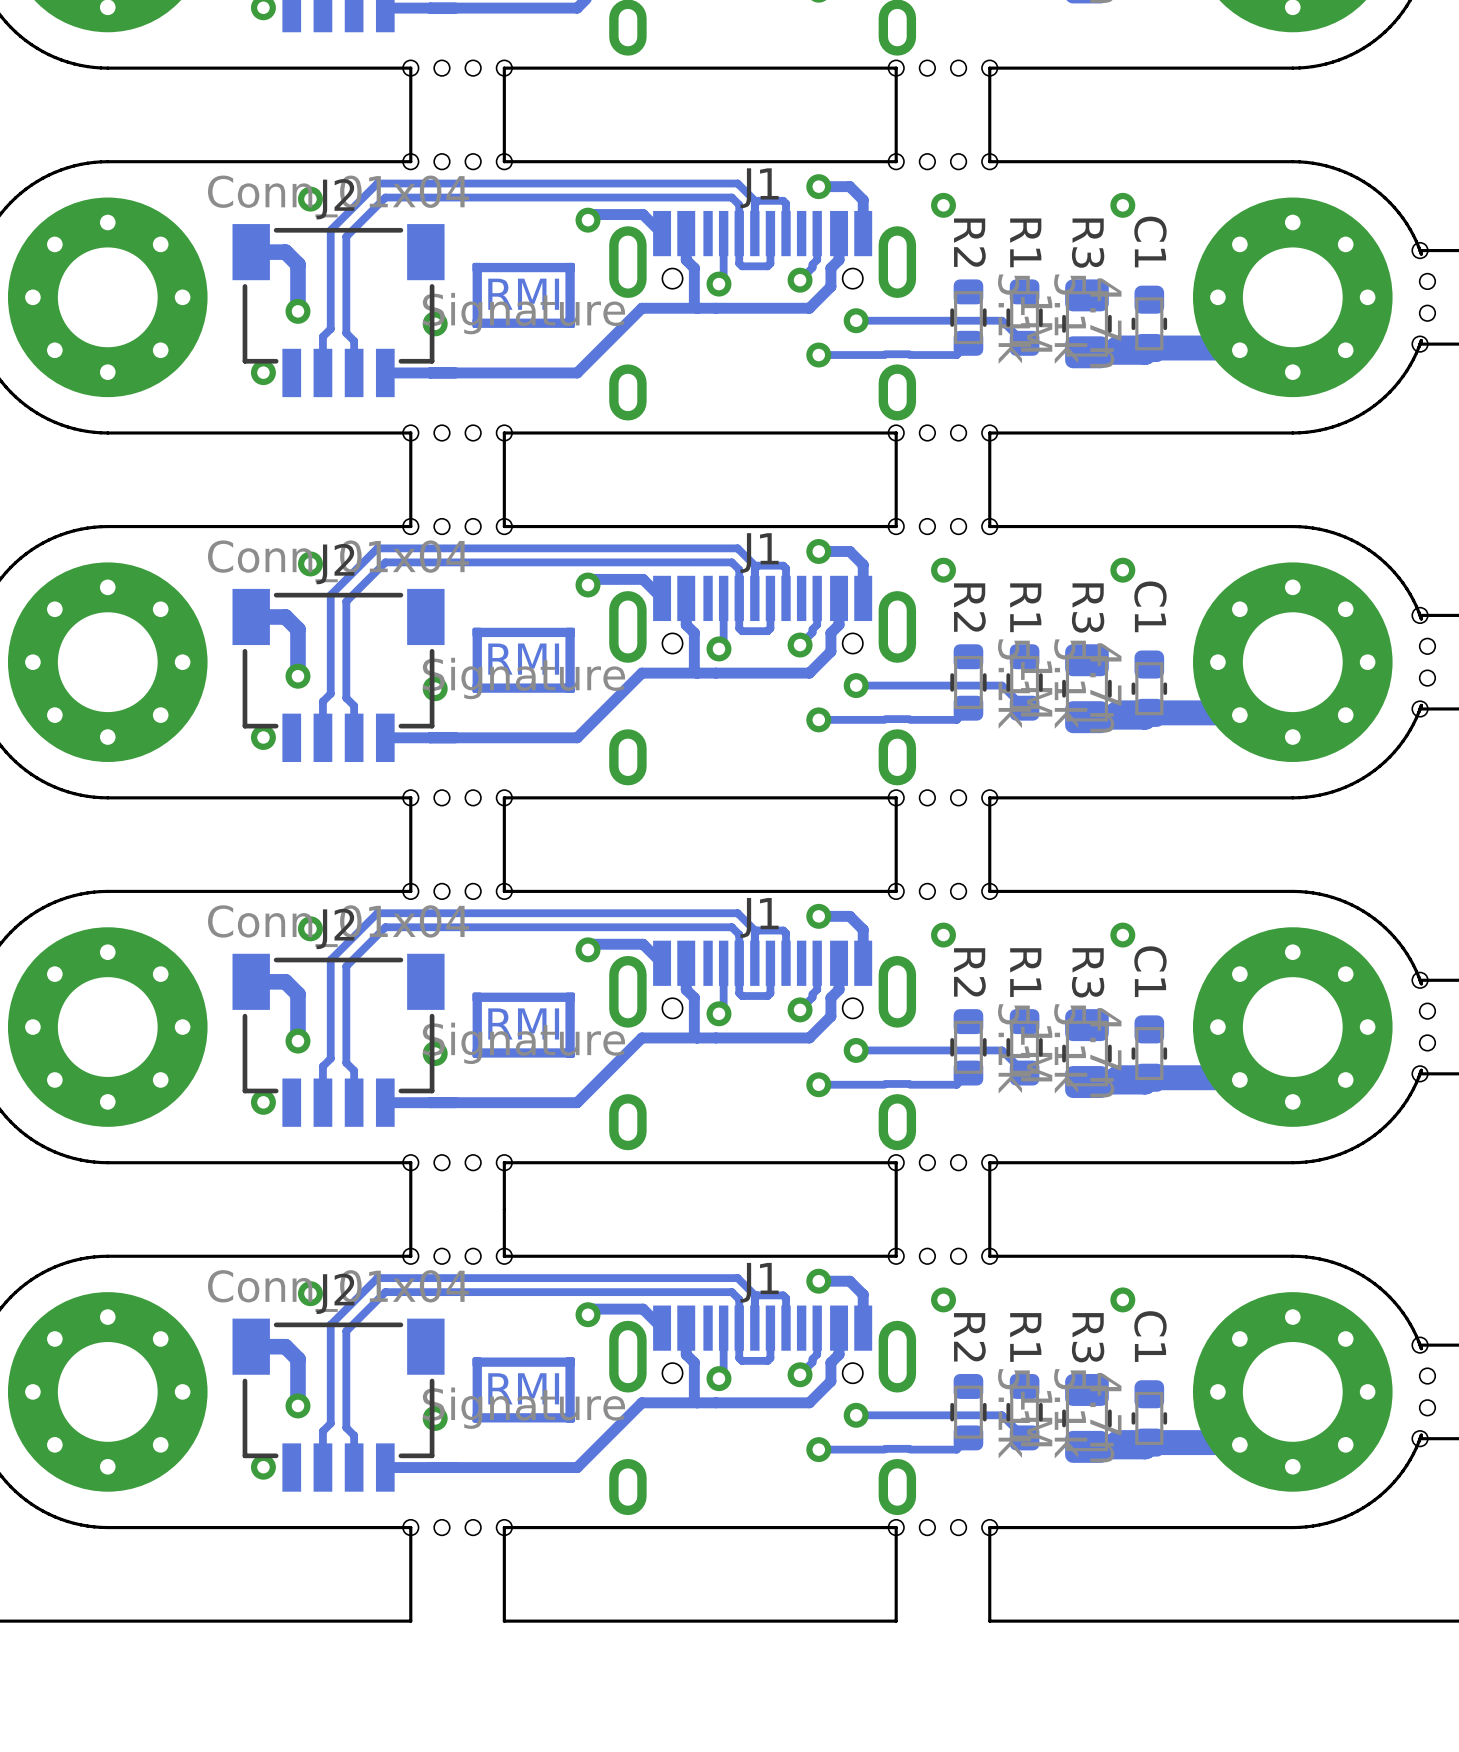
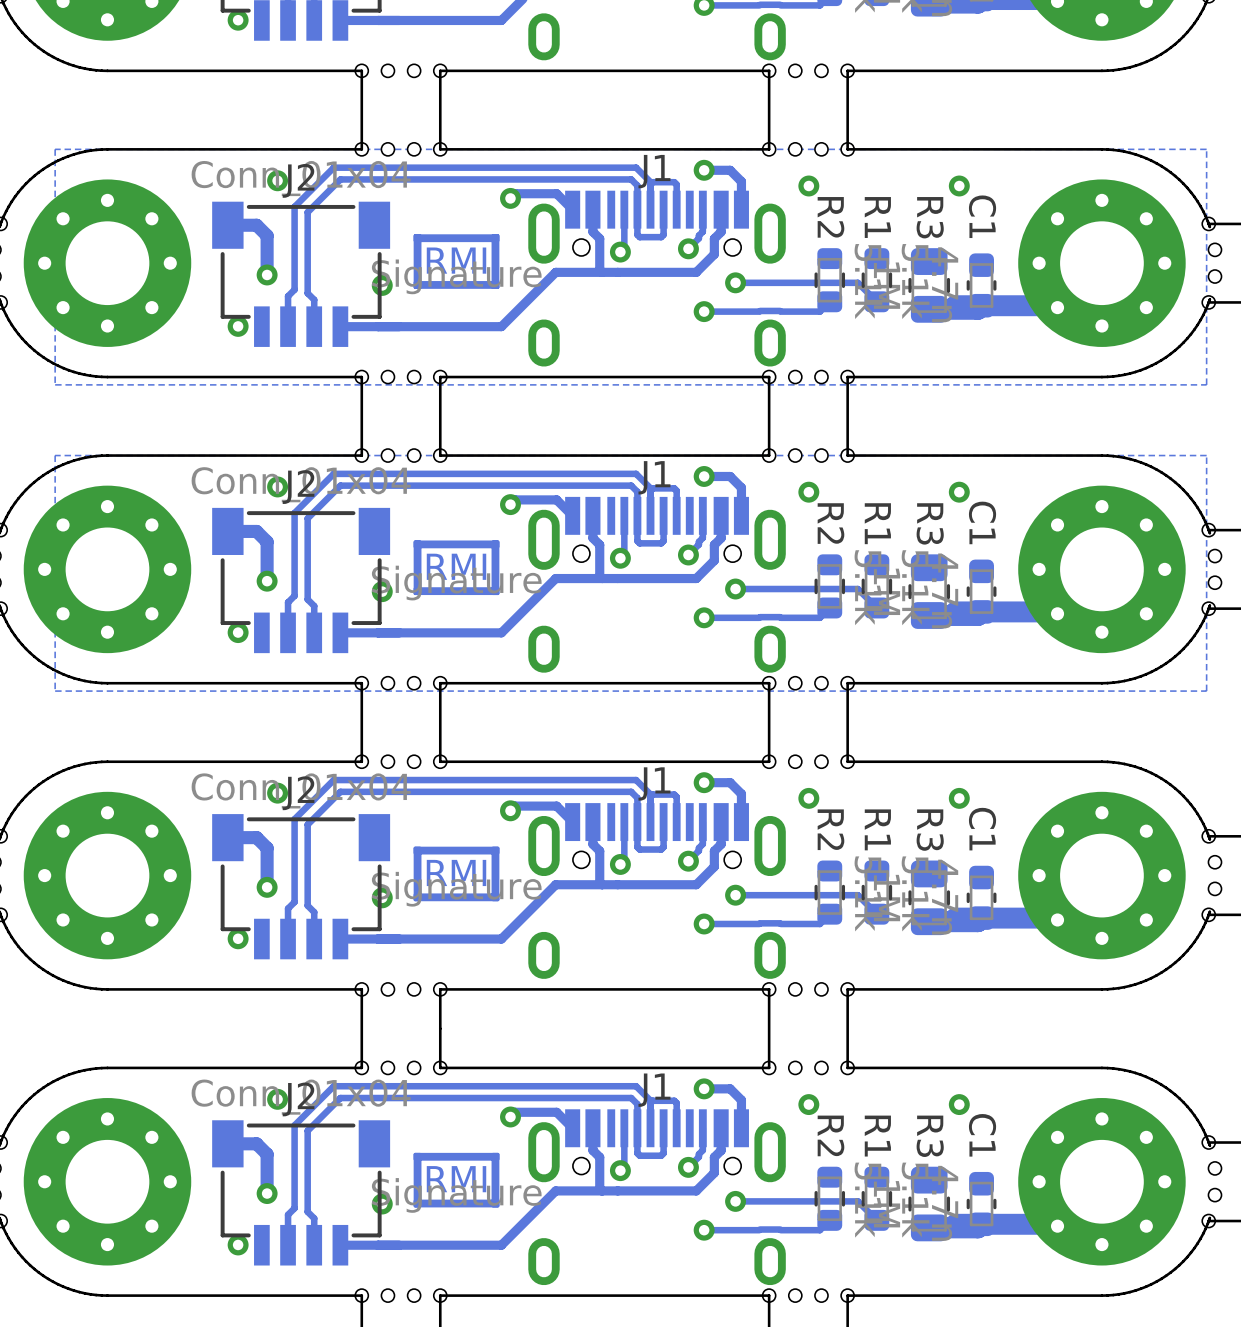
zone outline: none -> (1206, 149) (1206, 384) (55, 384) (55, 149) (1206, 149)
zone outline: none -> (1206, 455) (55, 455) (55, 691) (1206, 691) (1206, 455)

